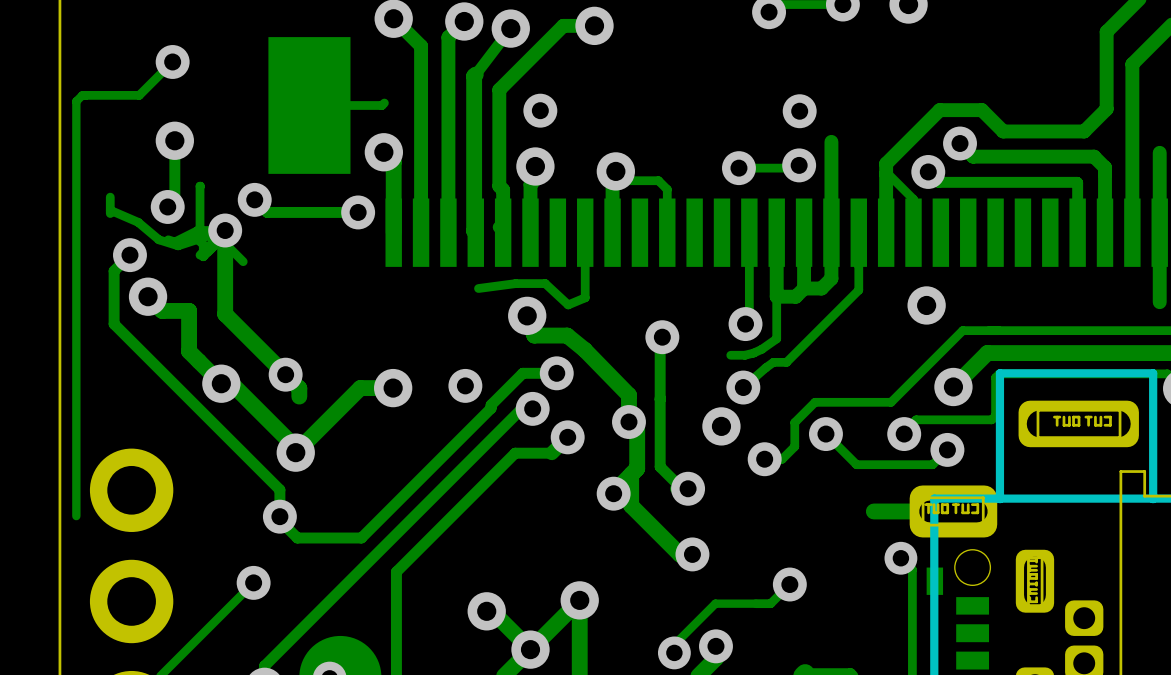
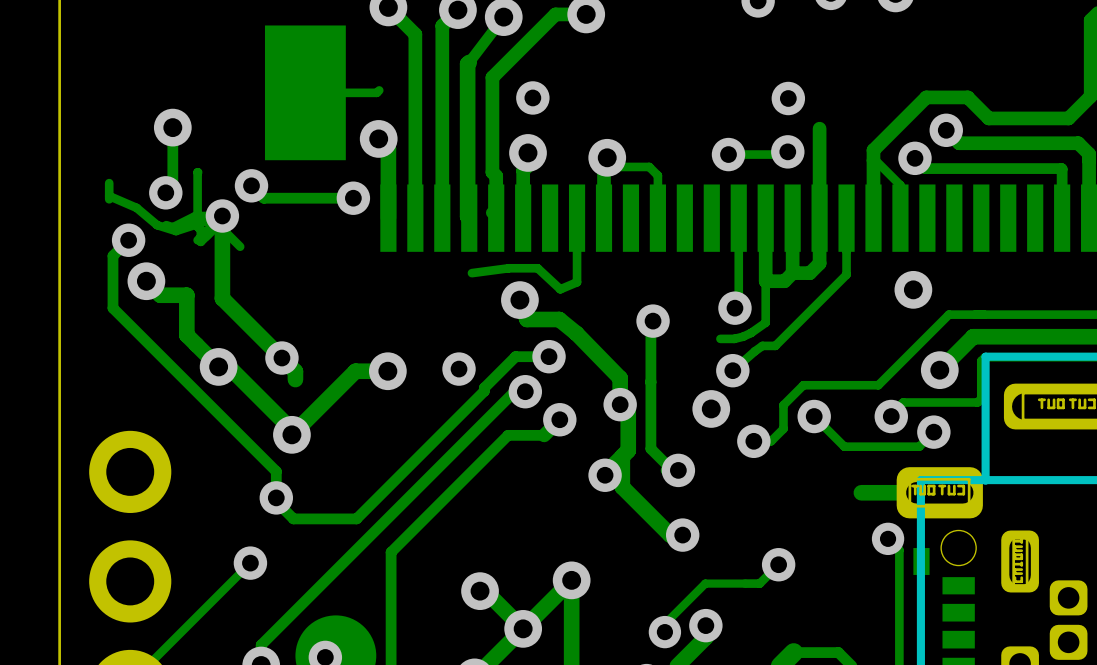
track: (172, 61) (139, 95) (84, 95) -> none
via: (172, 61) -> none
track: (85, 95) (82, 95) (76, 101) (76, 516) -> none

